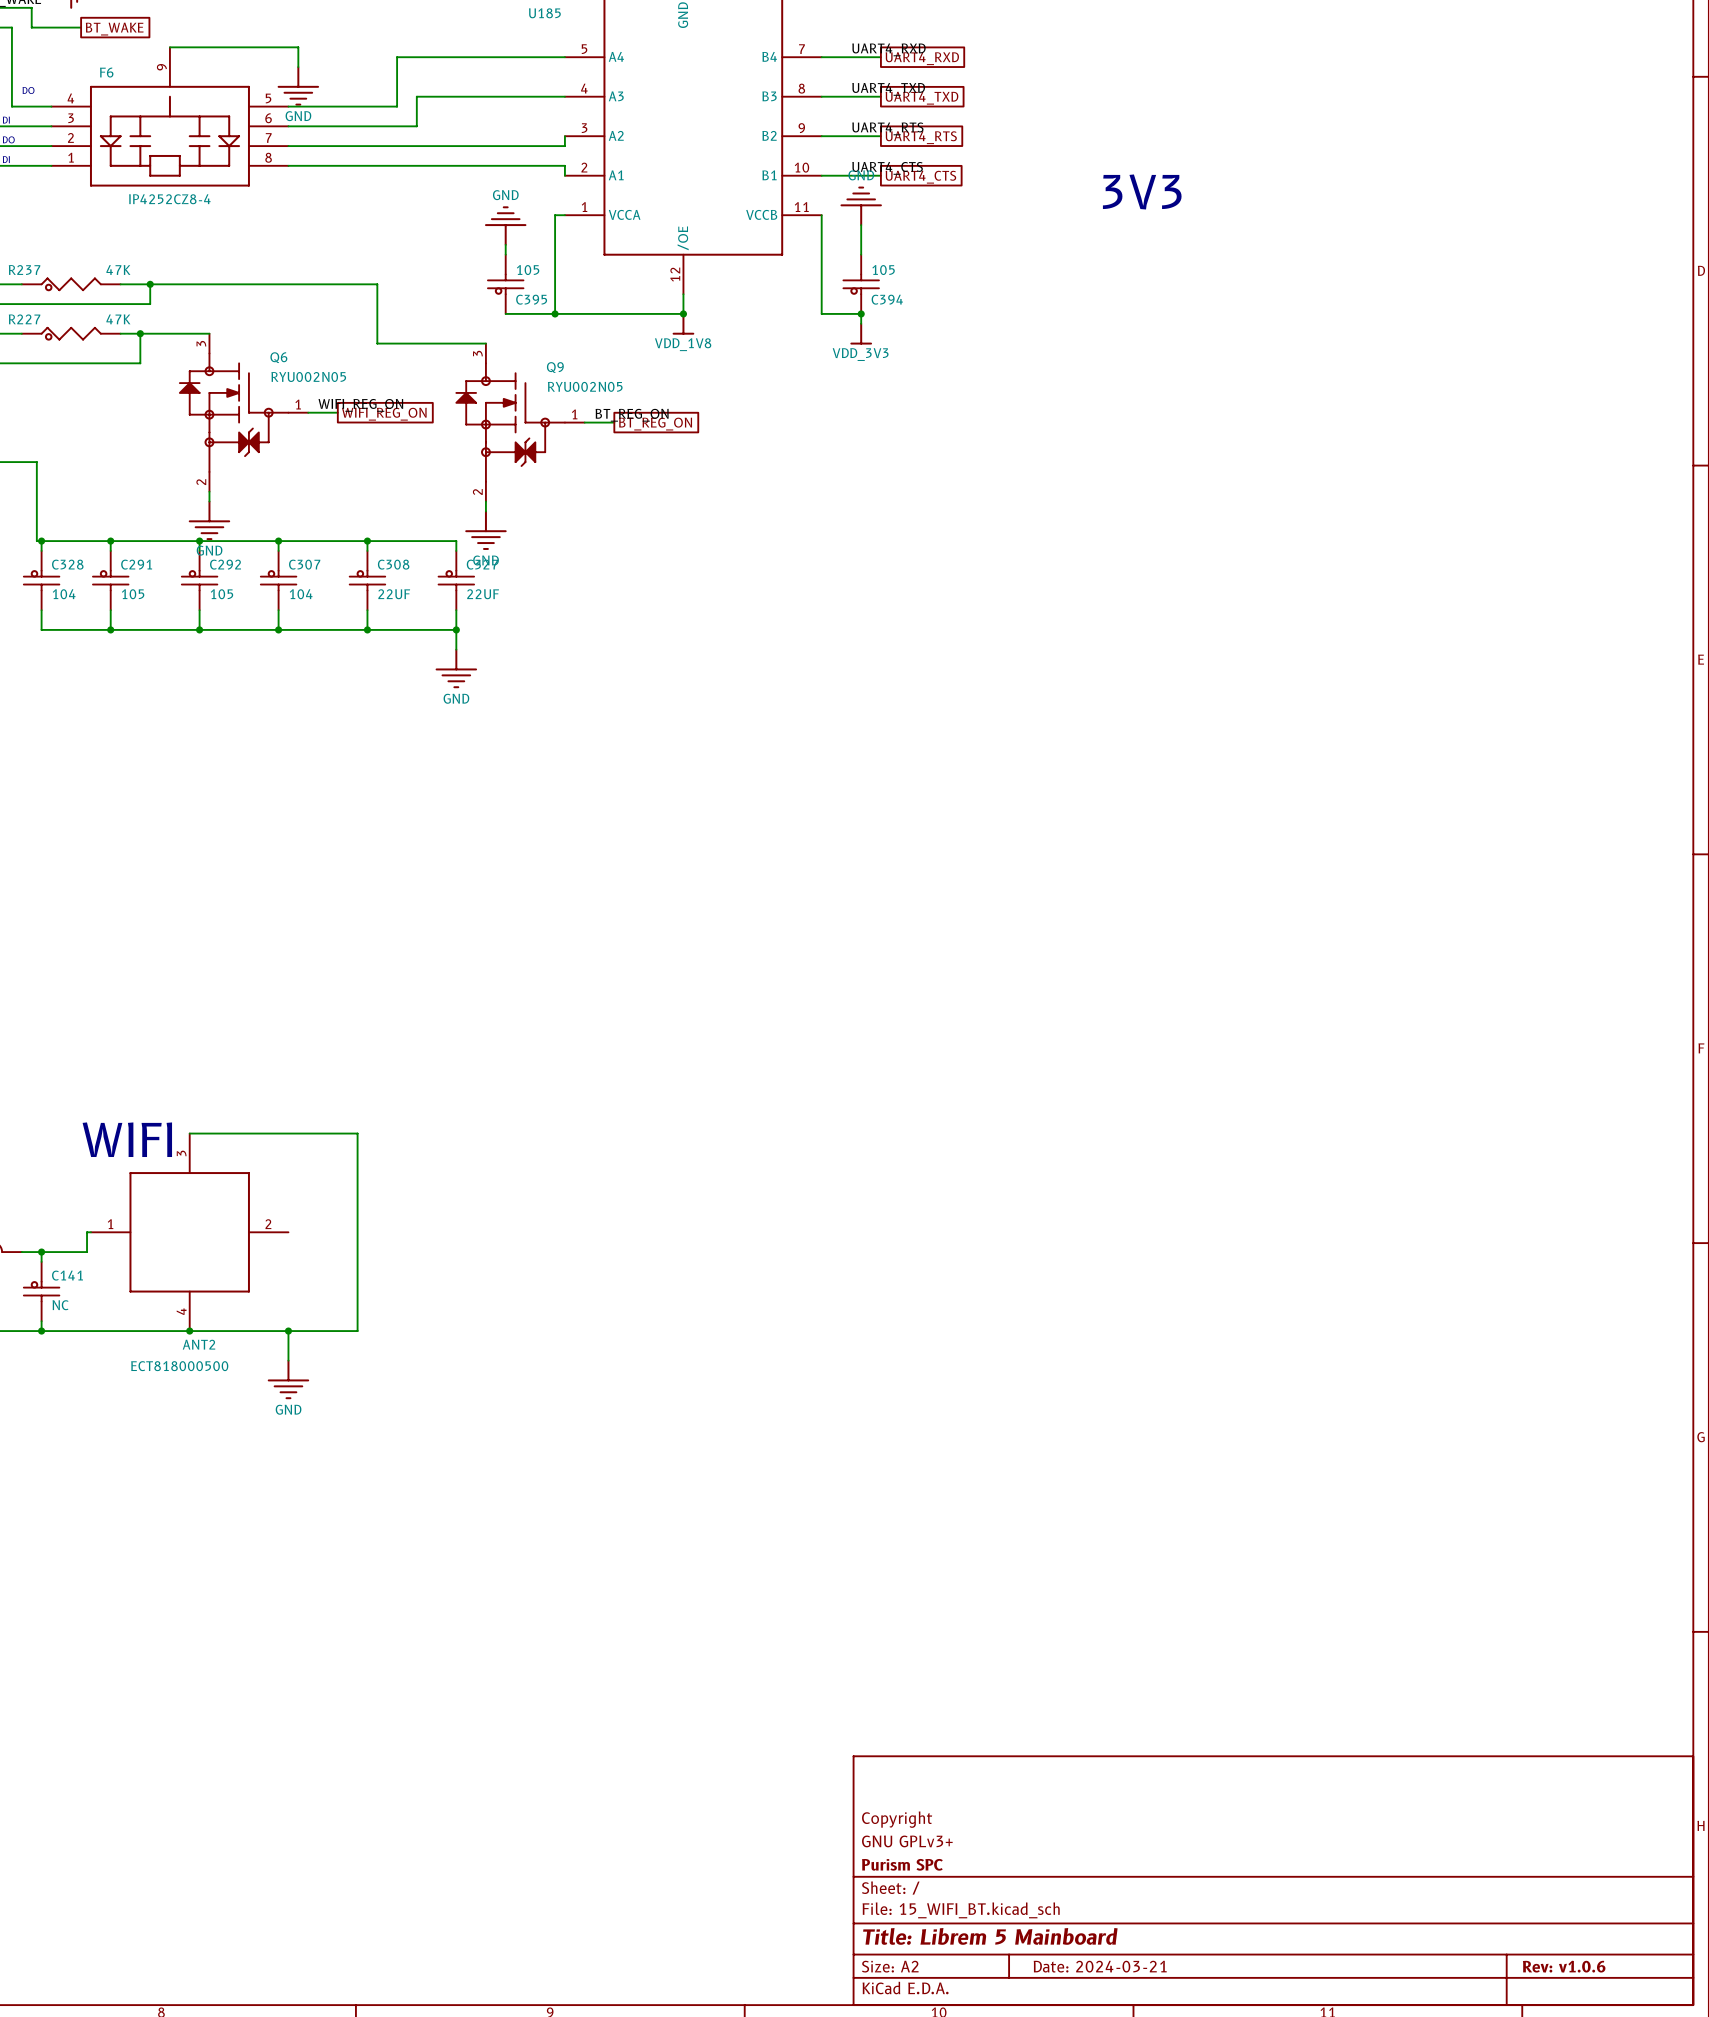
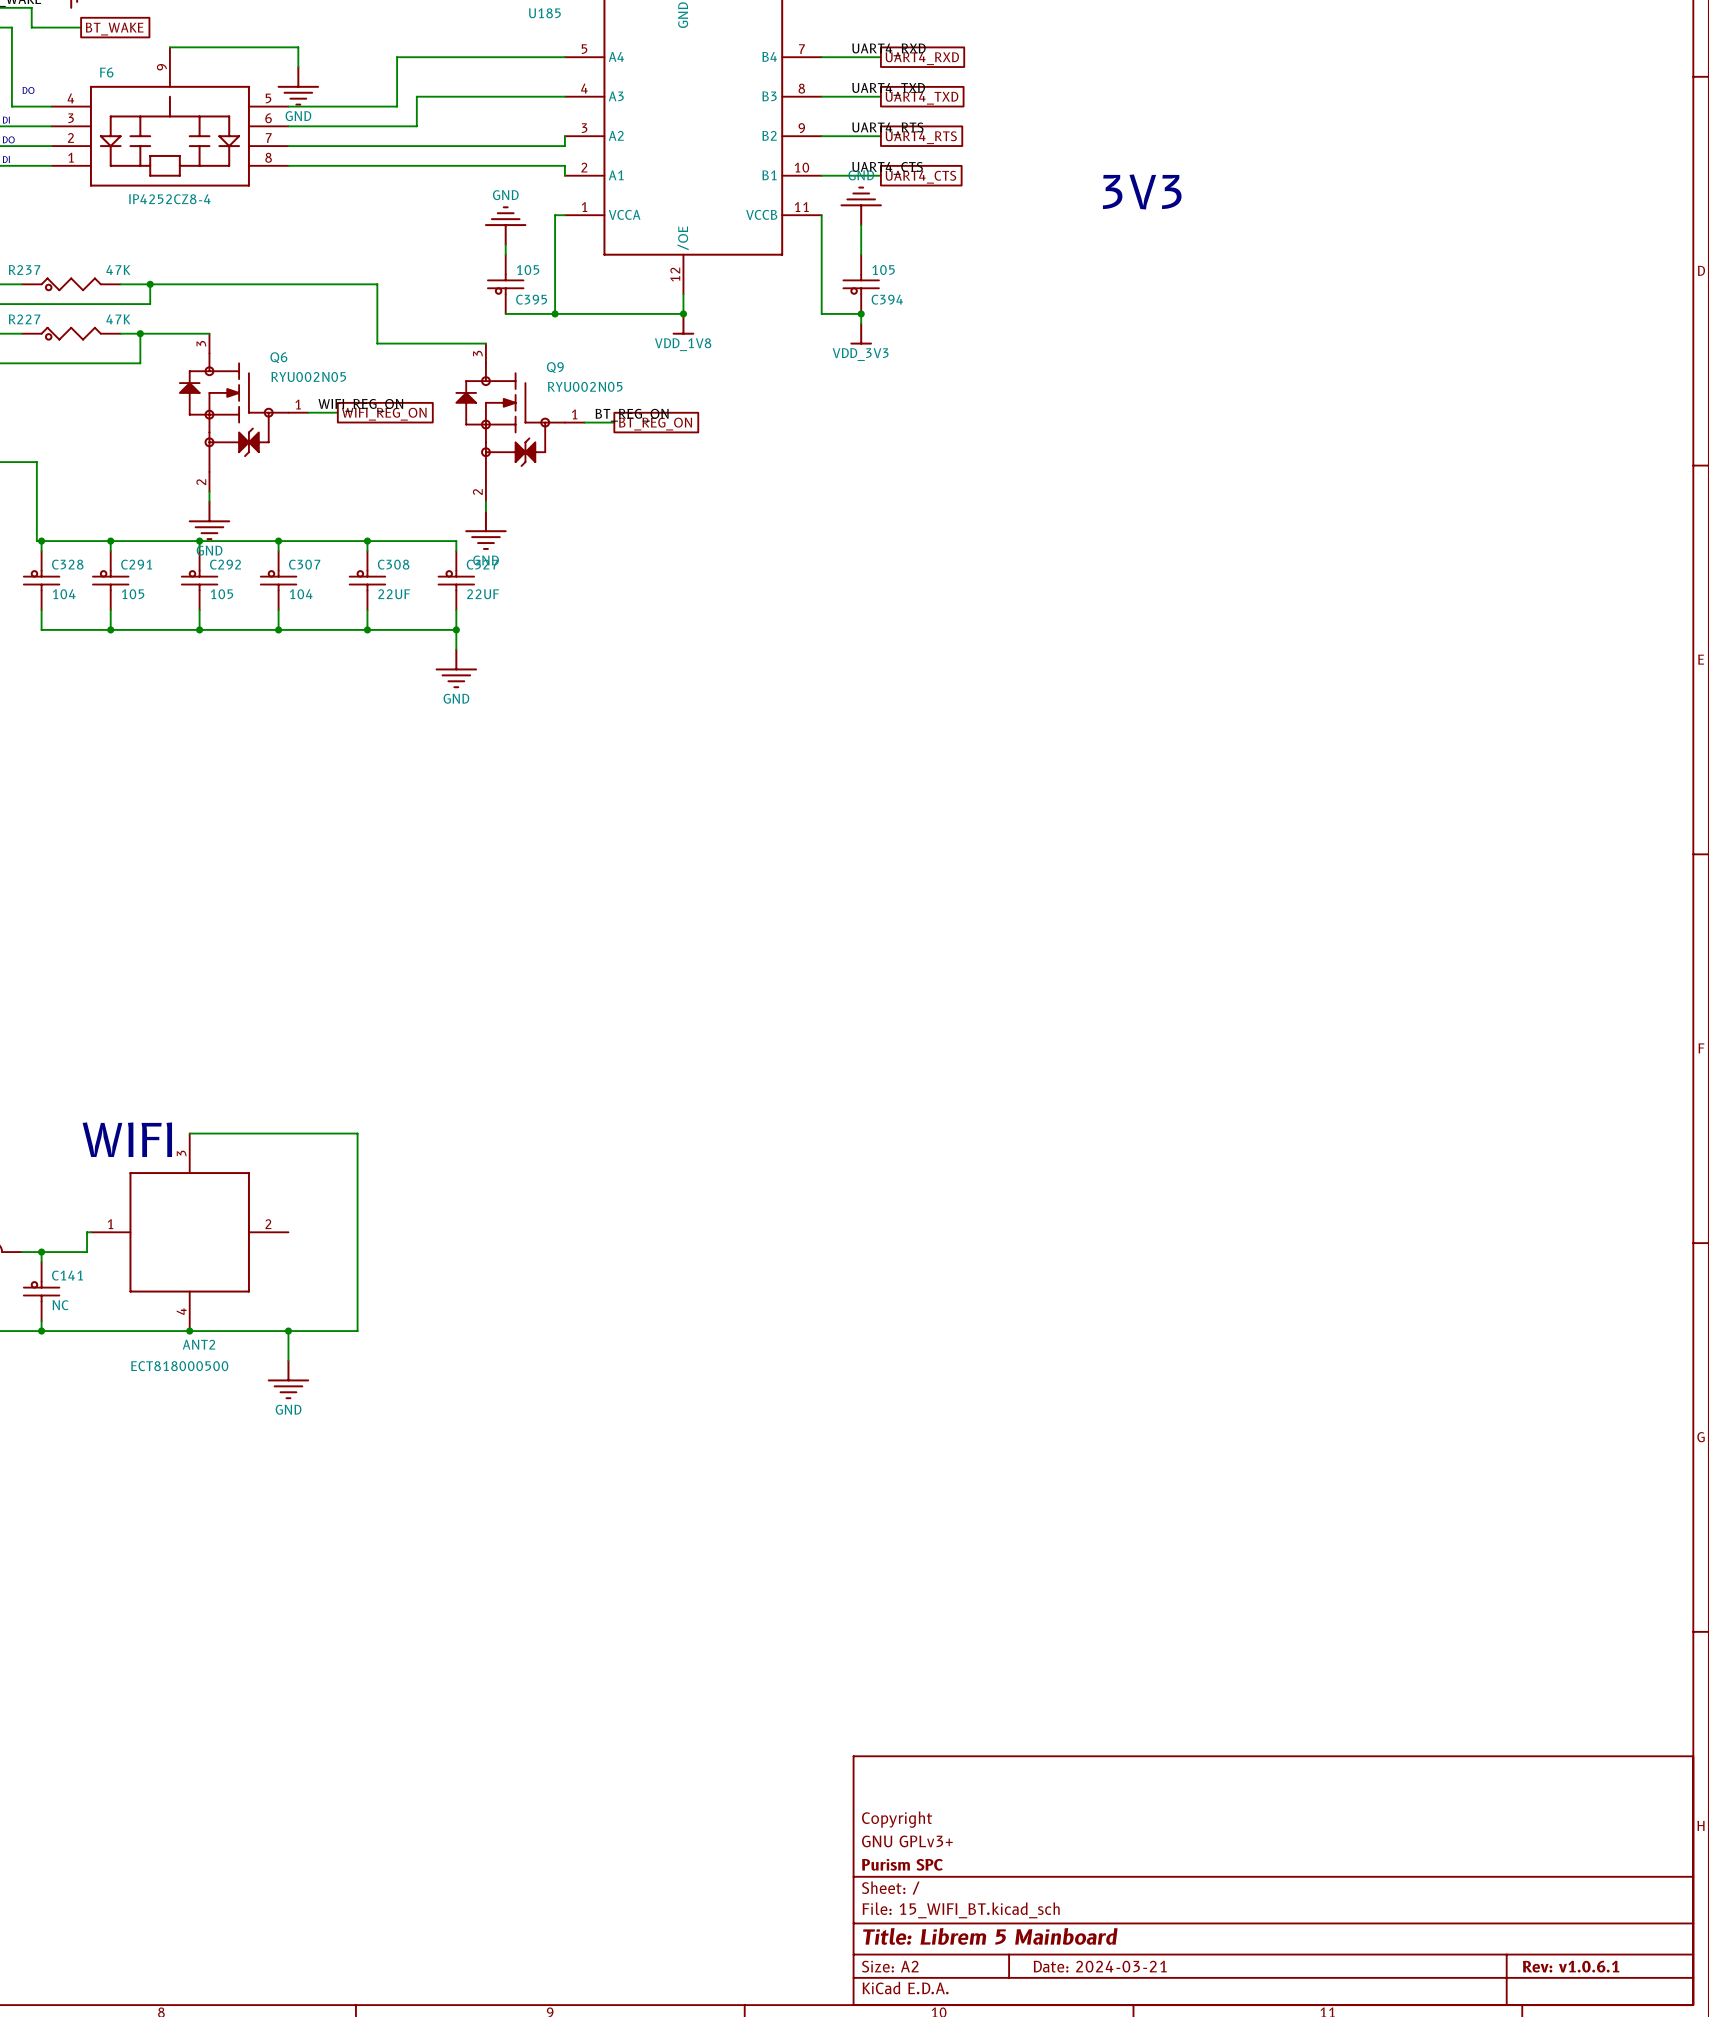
title block: Rev: v1.0.6 (1564, 1966) -> Rev: v1.0.6.1 (1571, 1966)

